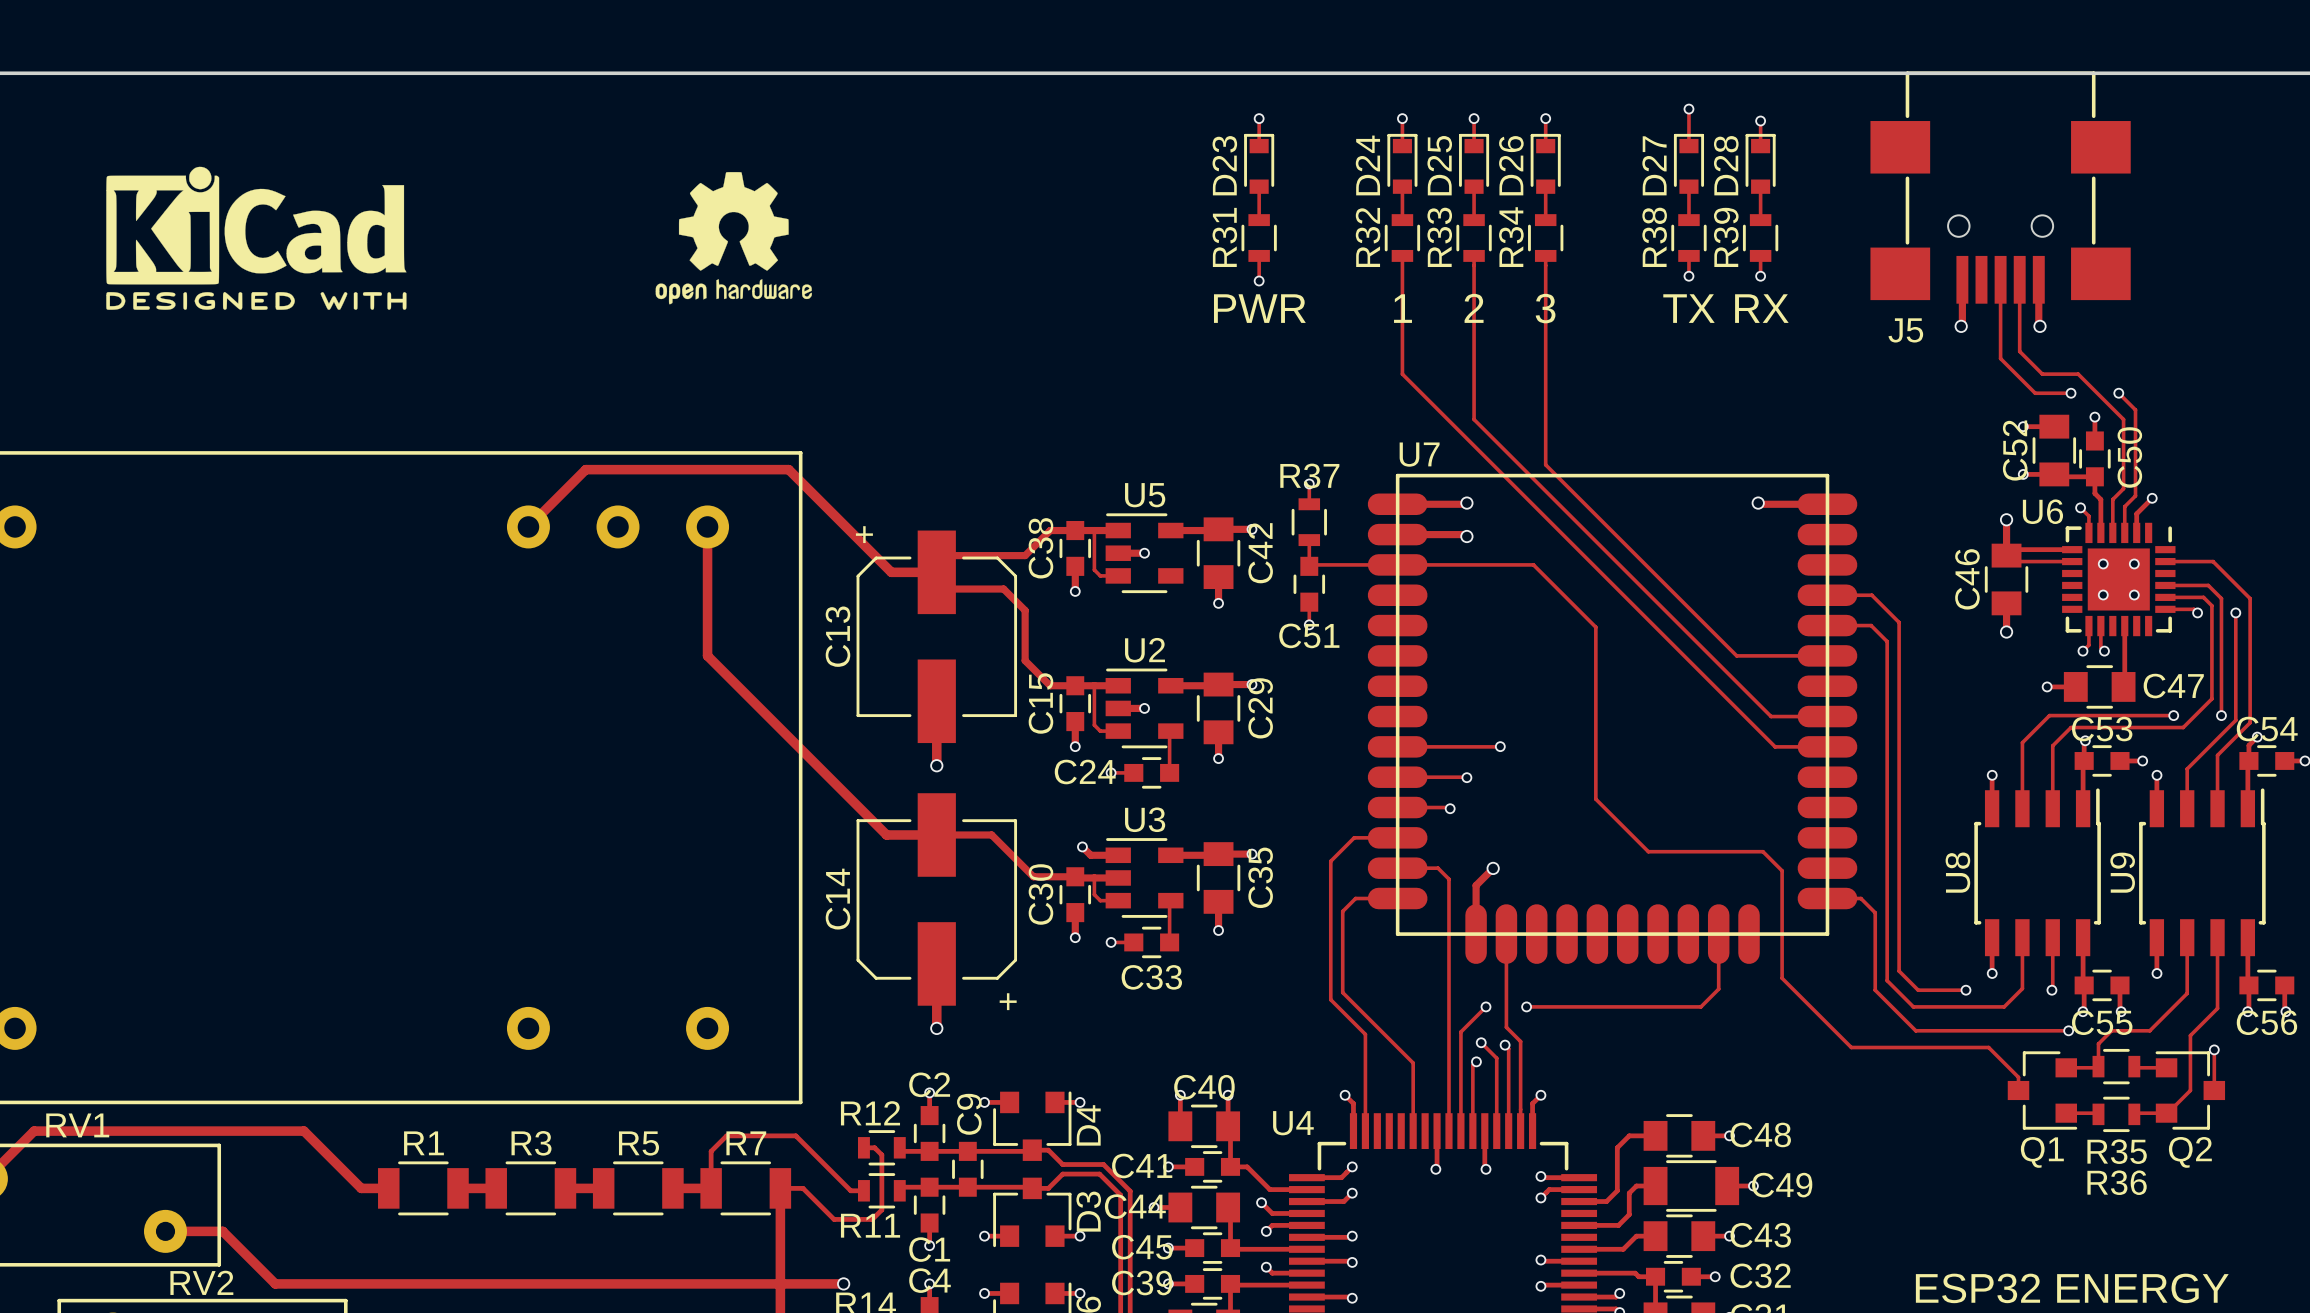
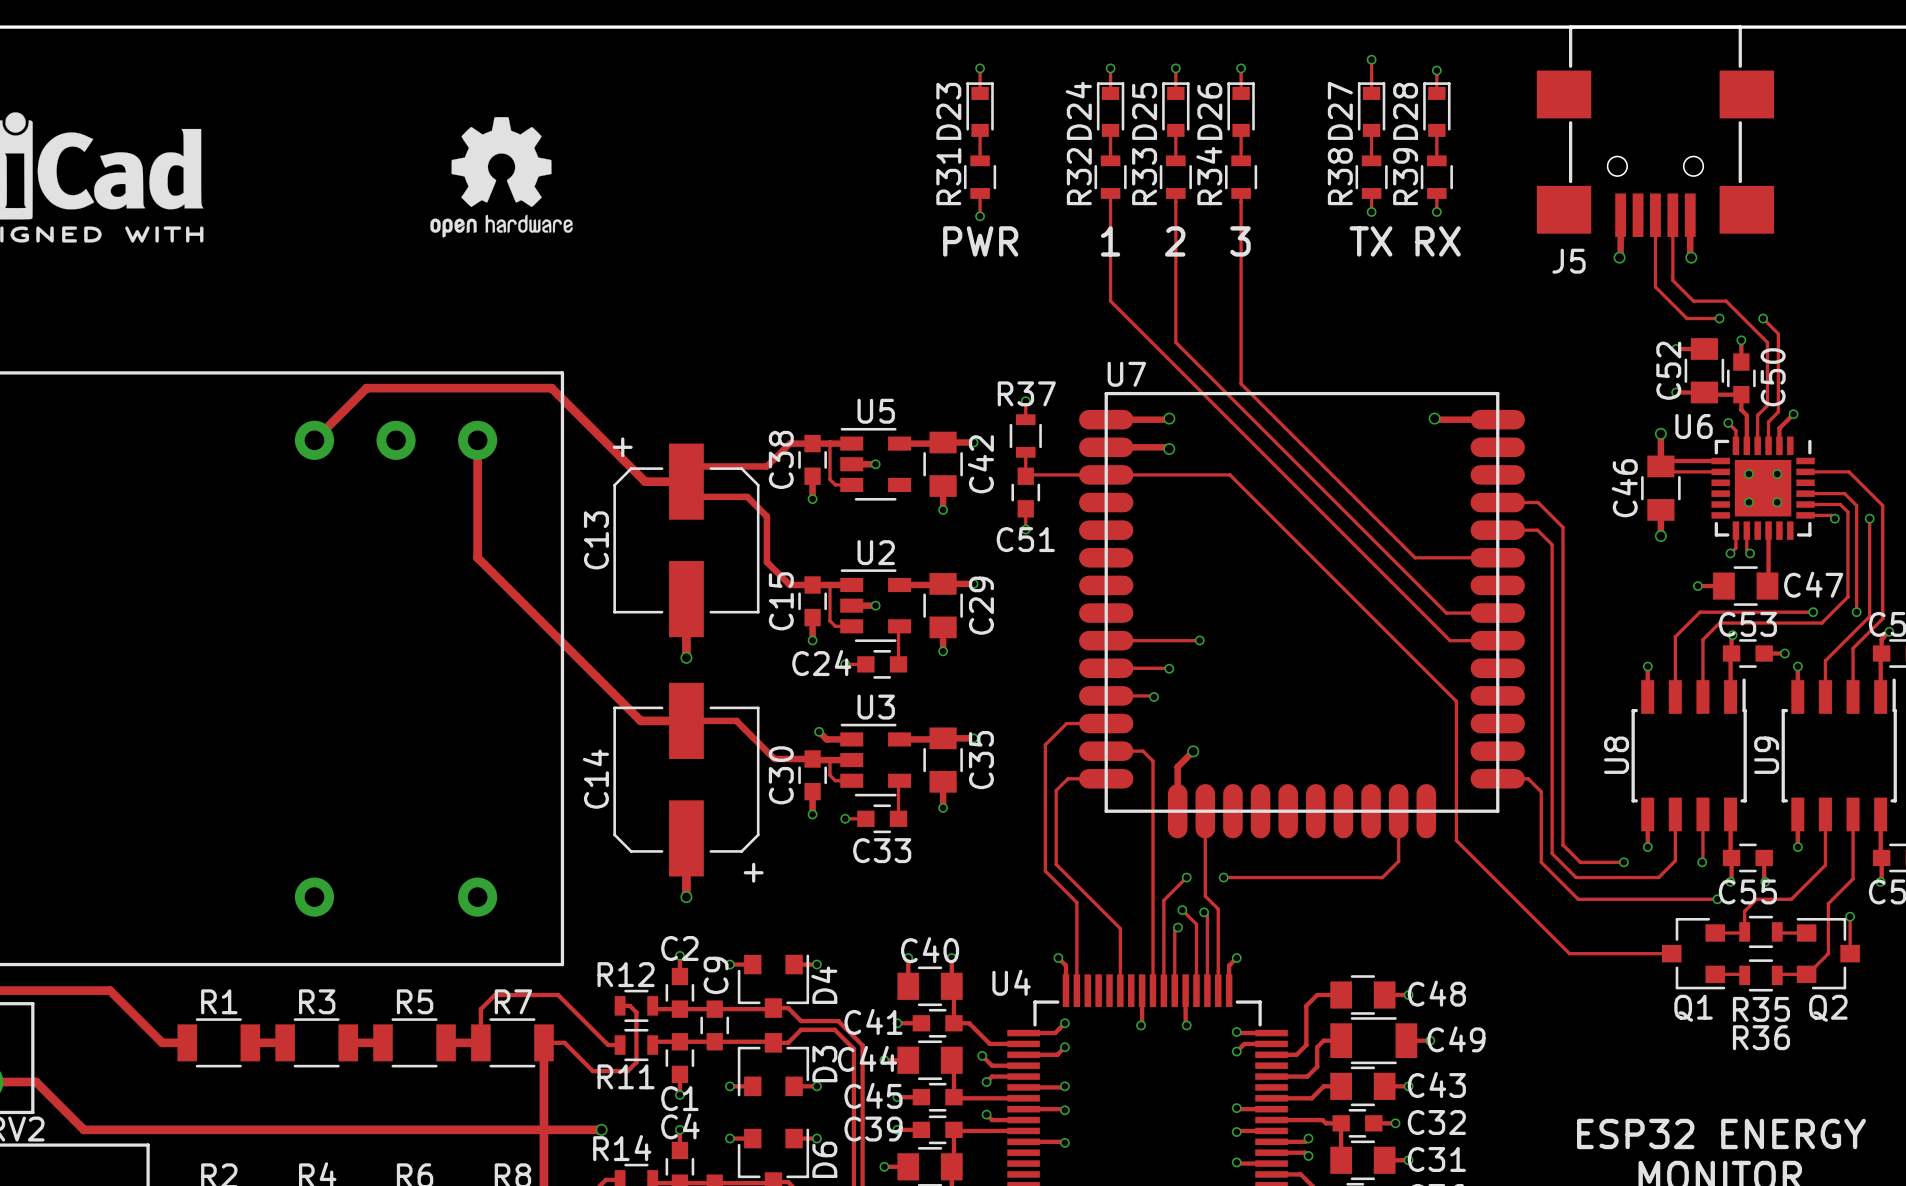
track: (1595, 627) (1595, 799) (1648, 851) (1763, 851) (1782, 870) -> (1286, 531) (1456, 701) (1456, 753)
track: (1782, 966) (1782, 978) (1851, 1047) (1988, 1047) (2018, 1077) (2018, 1090) -> (1456, 840) (1569, 953) (1671, 953)

